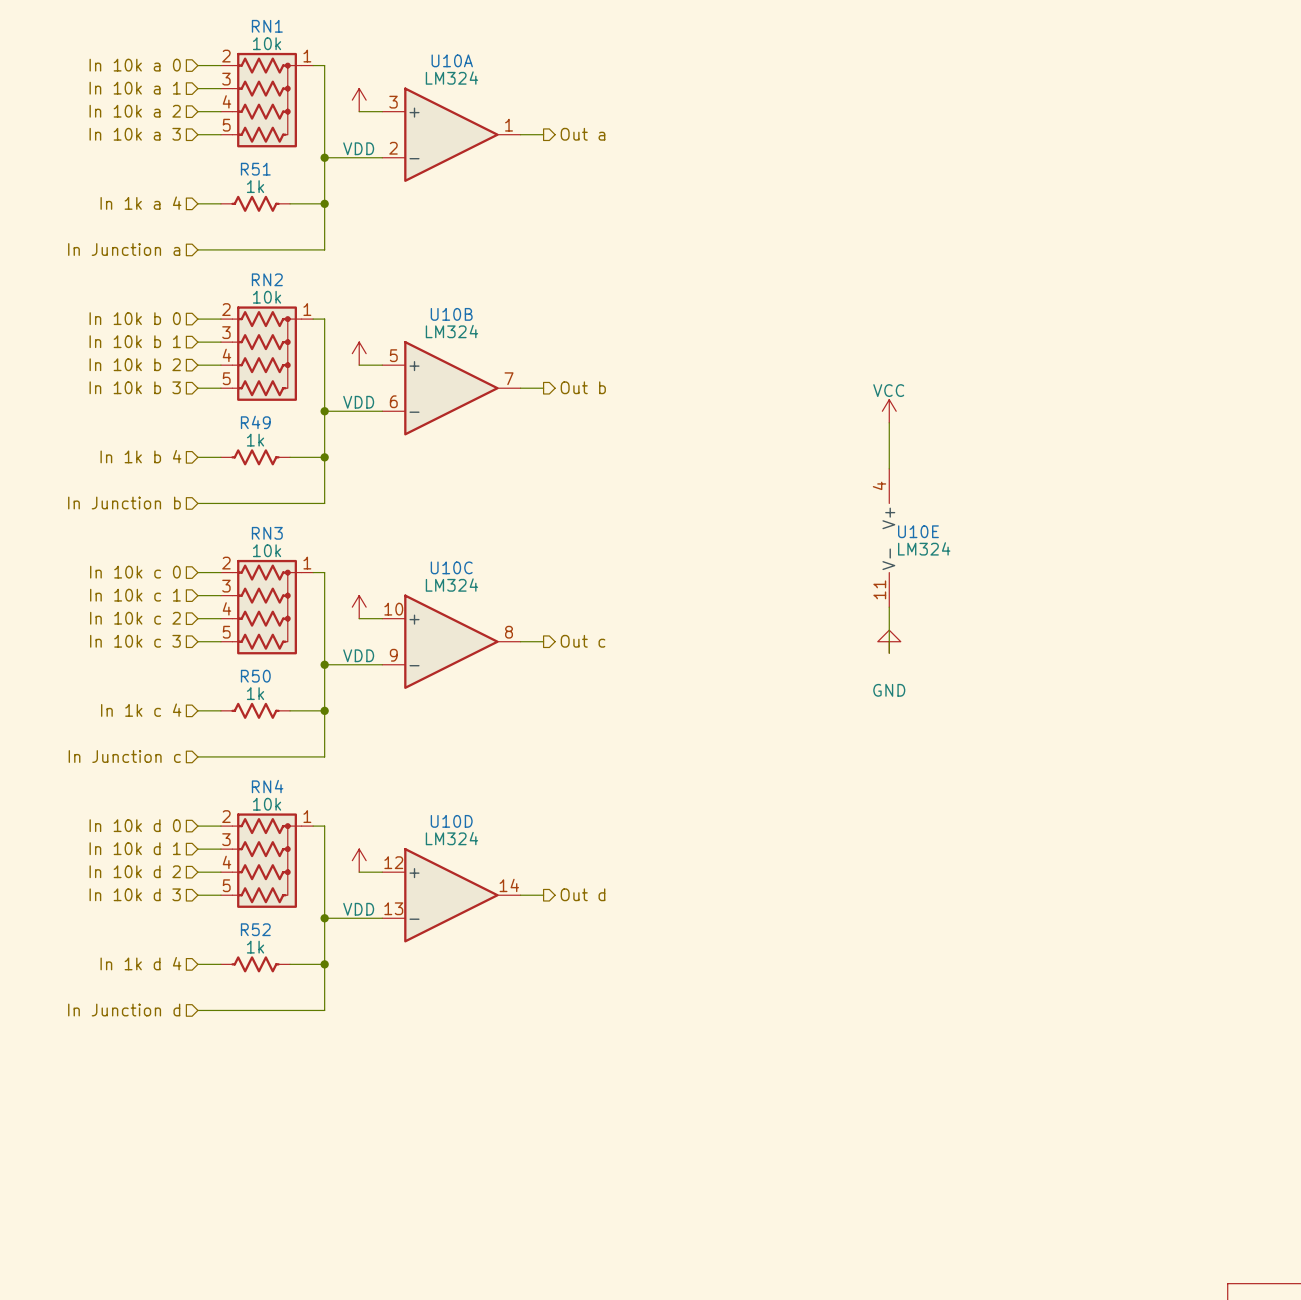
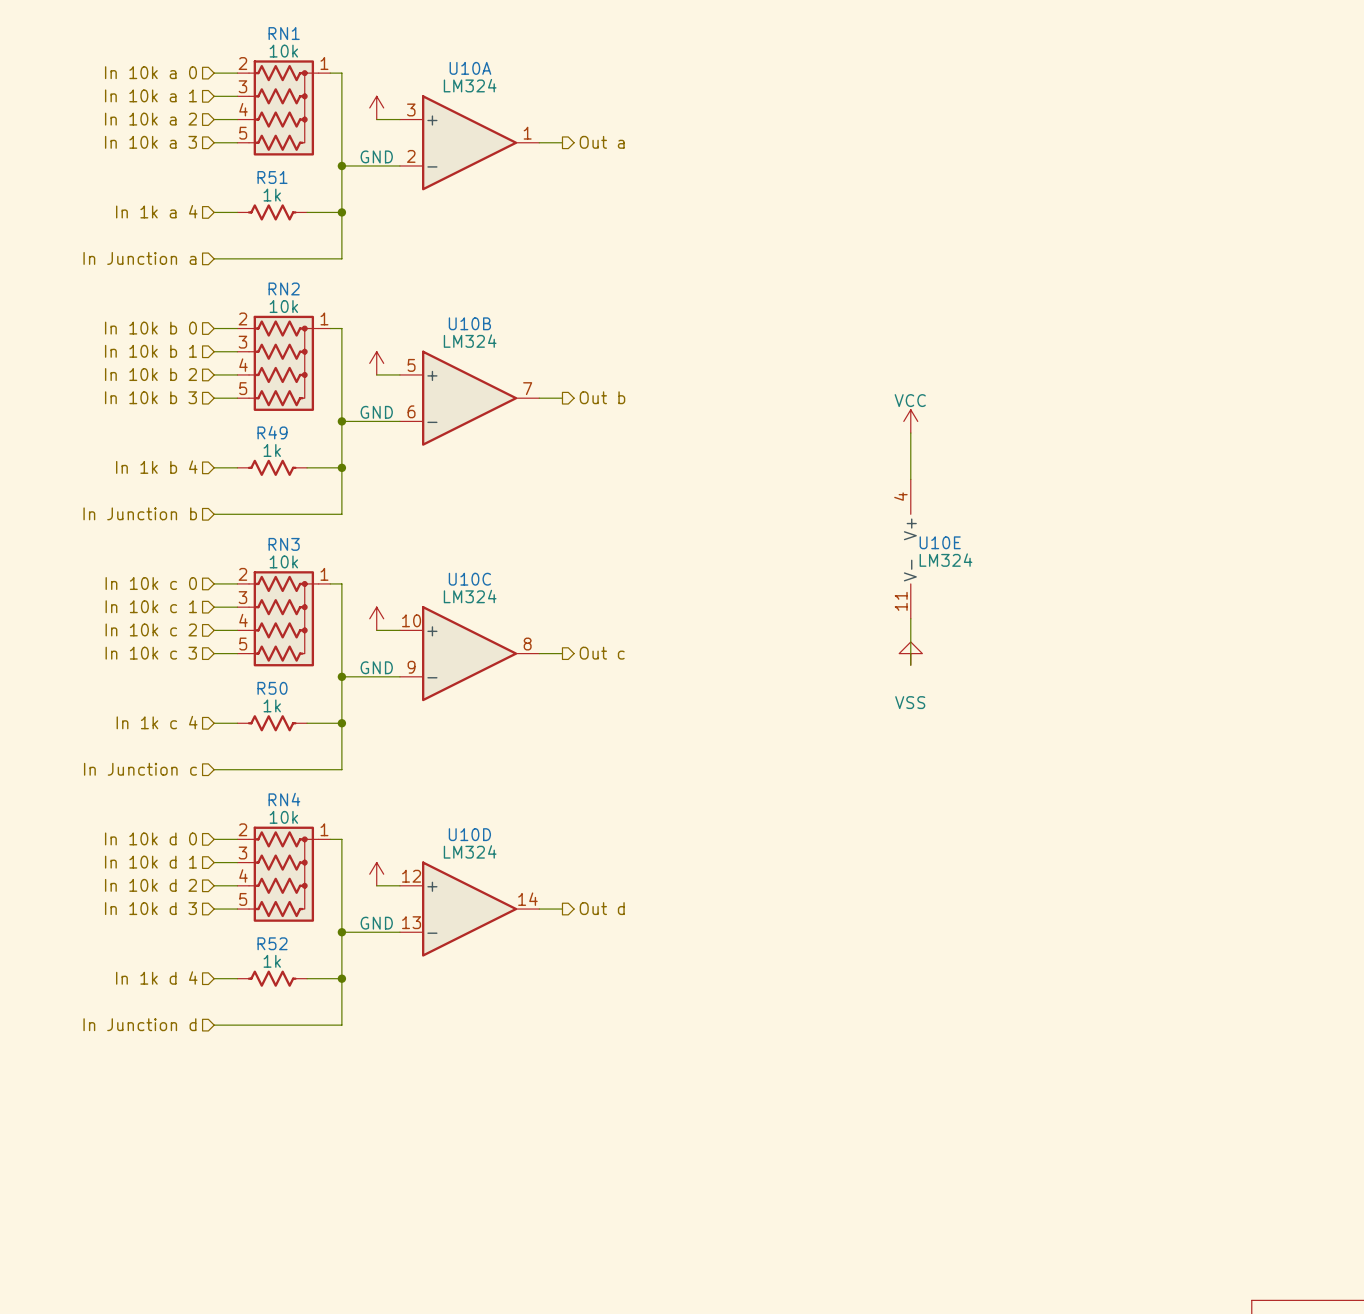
power symbol: VDD (359, 100) -> GND (376, 107)
power symbol: VDD (359, 353) -> GND (376, 363)
power symbol: VDD (359, 607) -> GND (376, 618)
power symbol: GND (889, 641) -> VSS (910, 653)
power symbol: VDD (359, 860) -> GND (376, 874)

